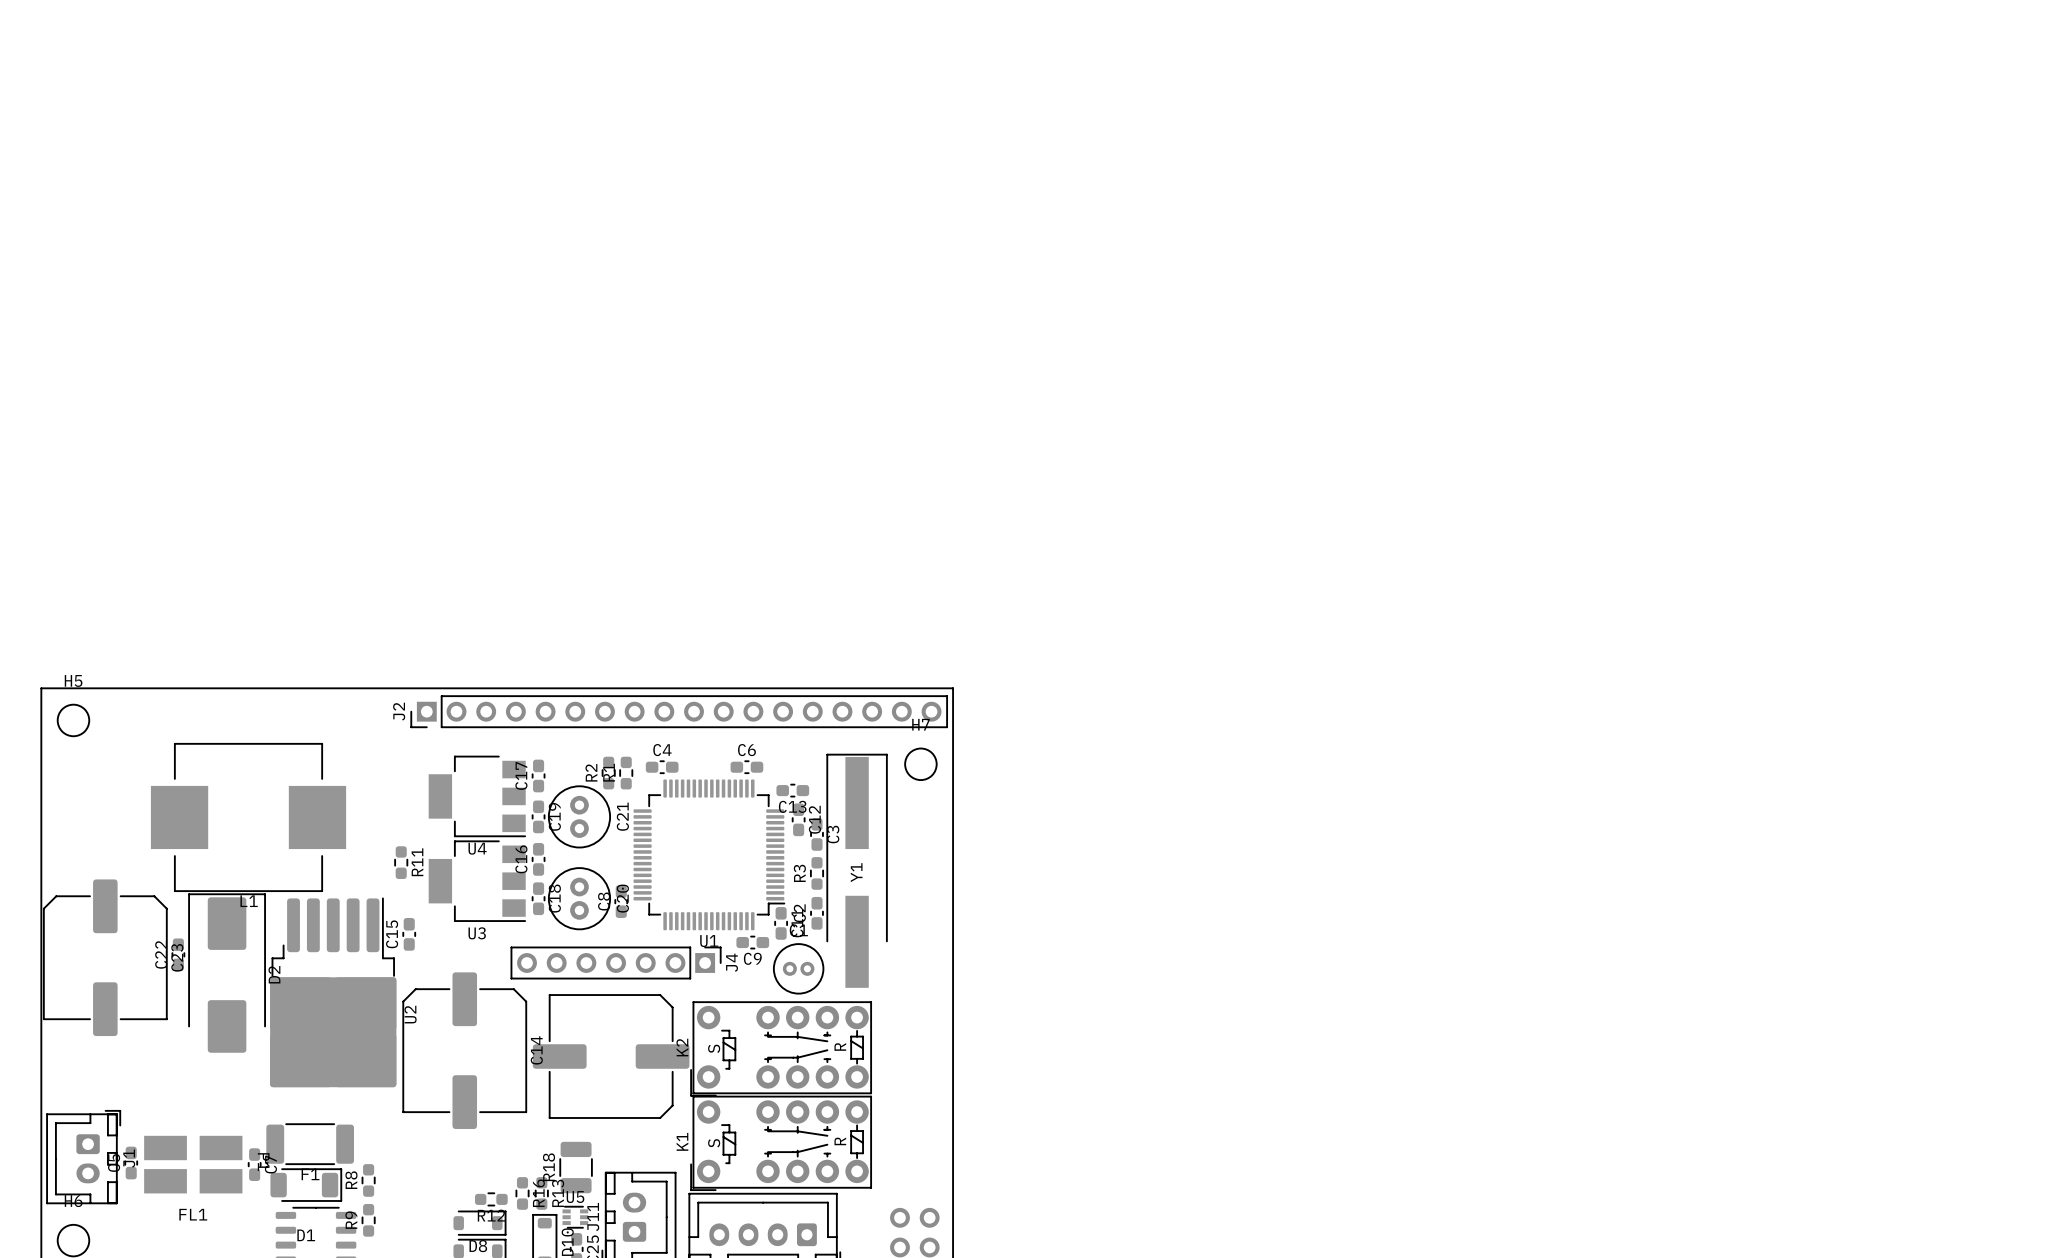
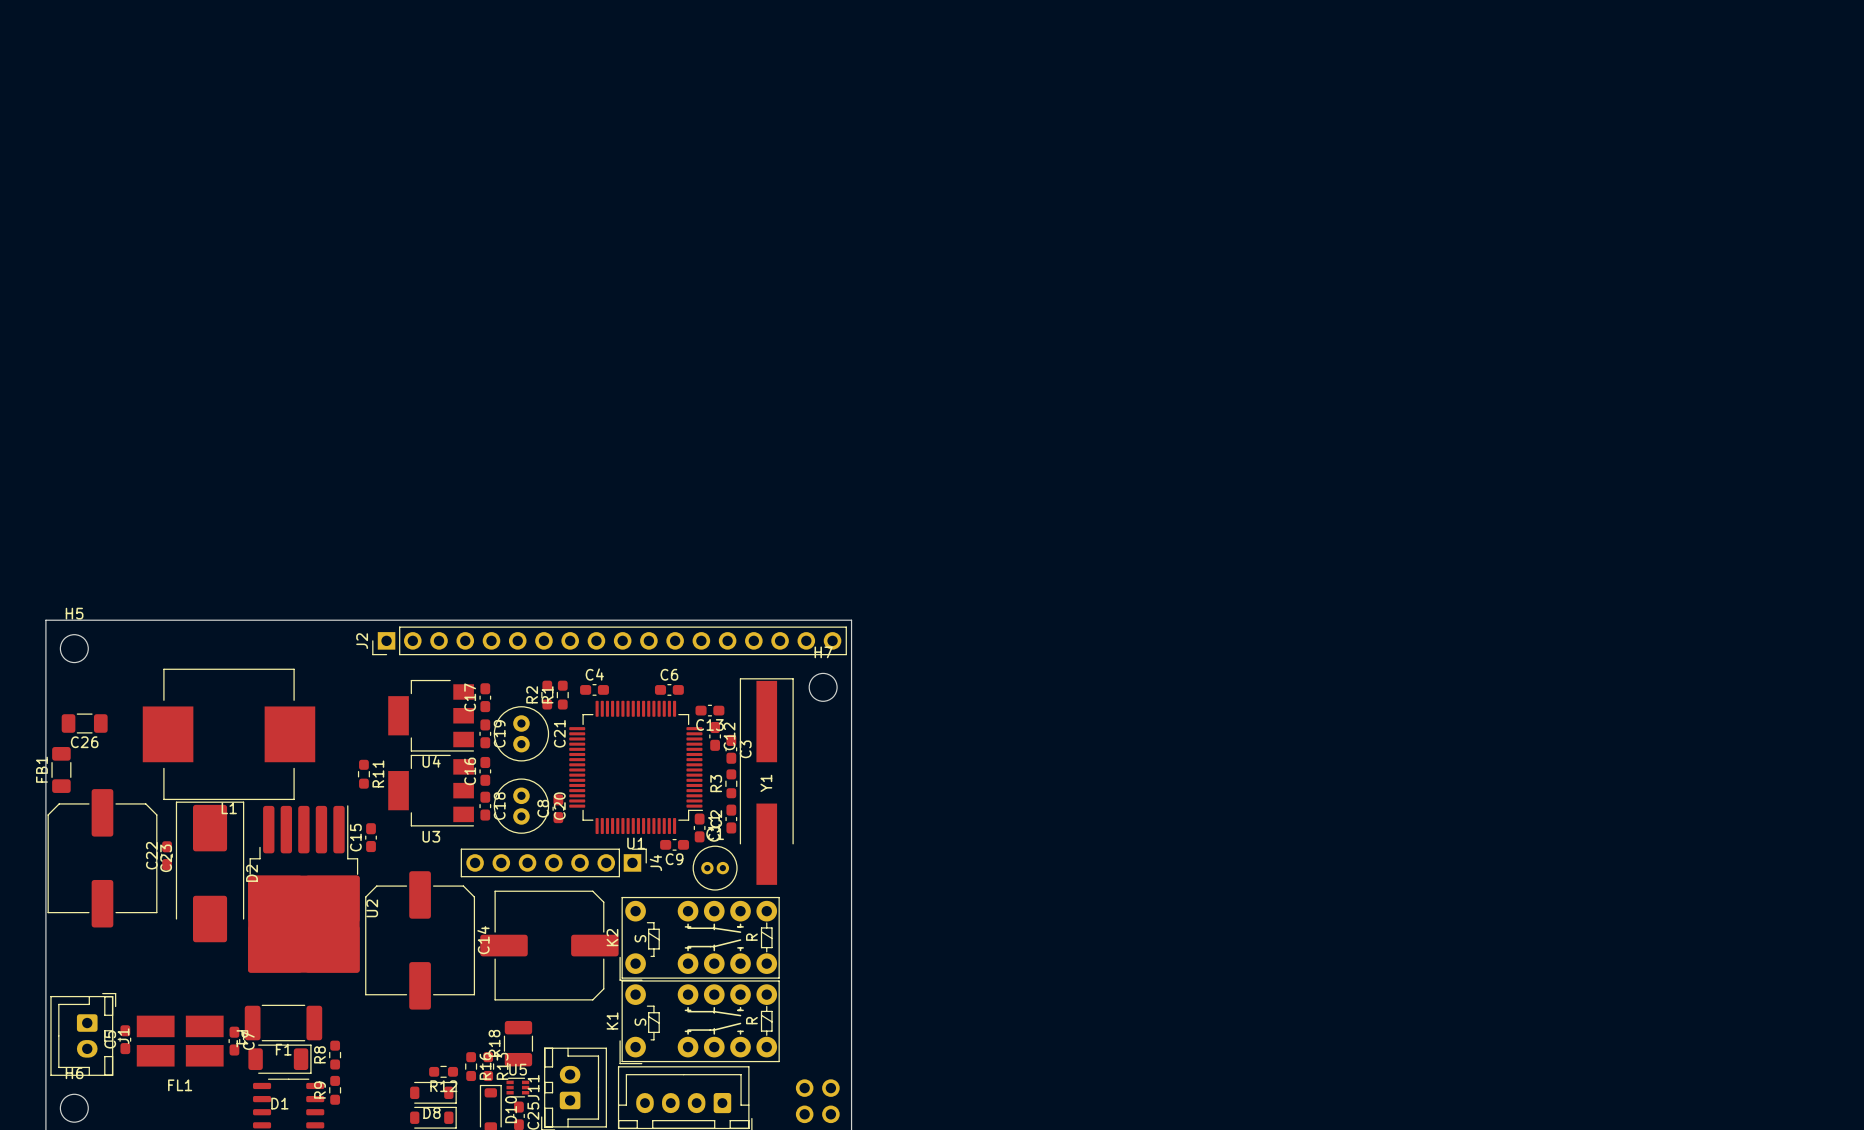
C26: none -> (84, 723)
FB1: none -> (61, 769)

